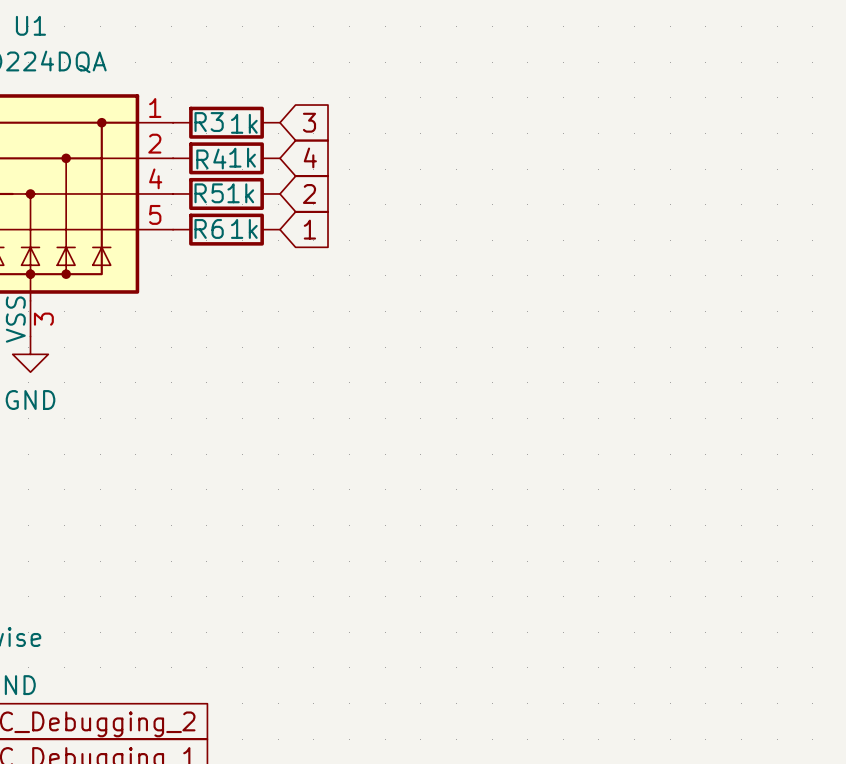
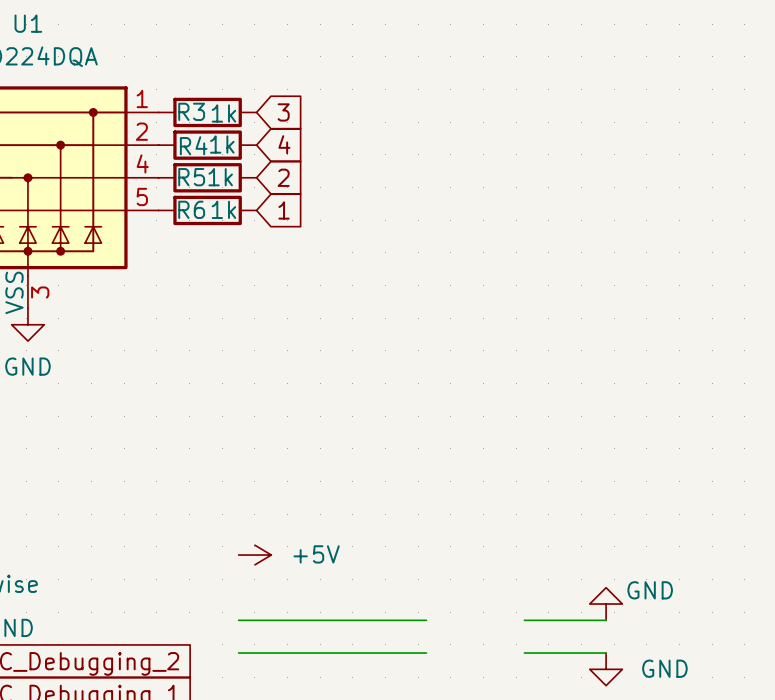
power symbol: none -> +5V (254, 555)
power symbol: none -> GND (606, 604)
wire: none -> (238, 620) (426, 620)
wire: none -> (524, 620) (606, 620)
wire: none -> (238, 653) (426, 653)
wire: none -> (524, 653) (606, 653)
power symbol: none -> GND (606, 669)

